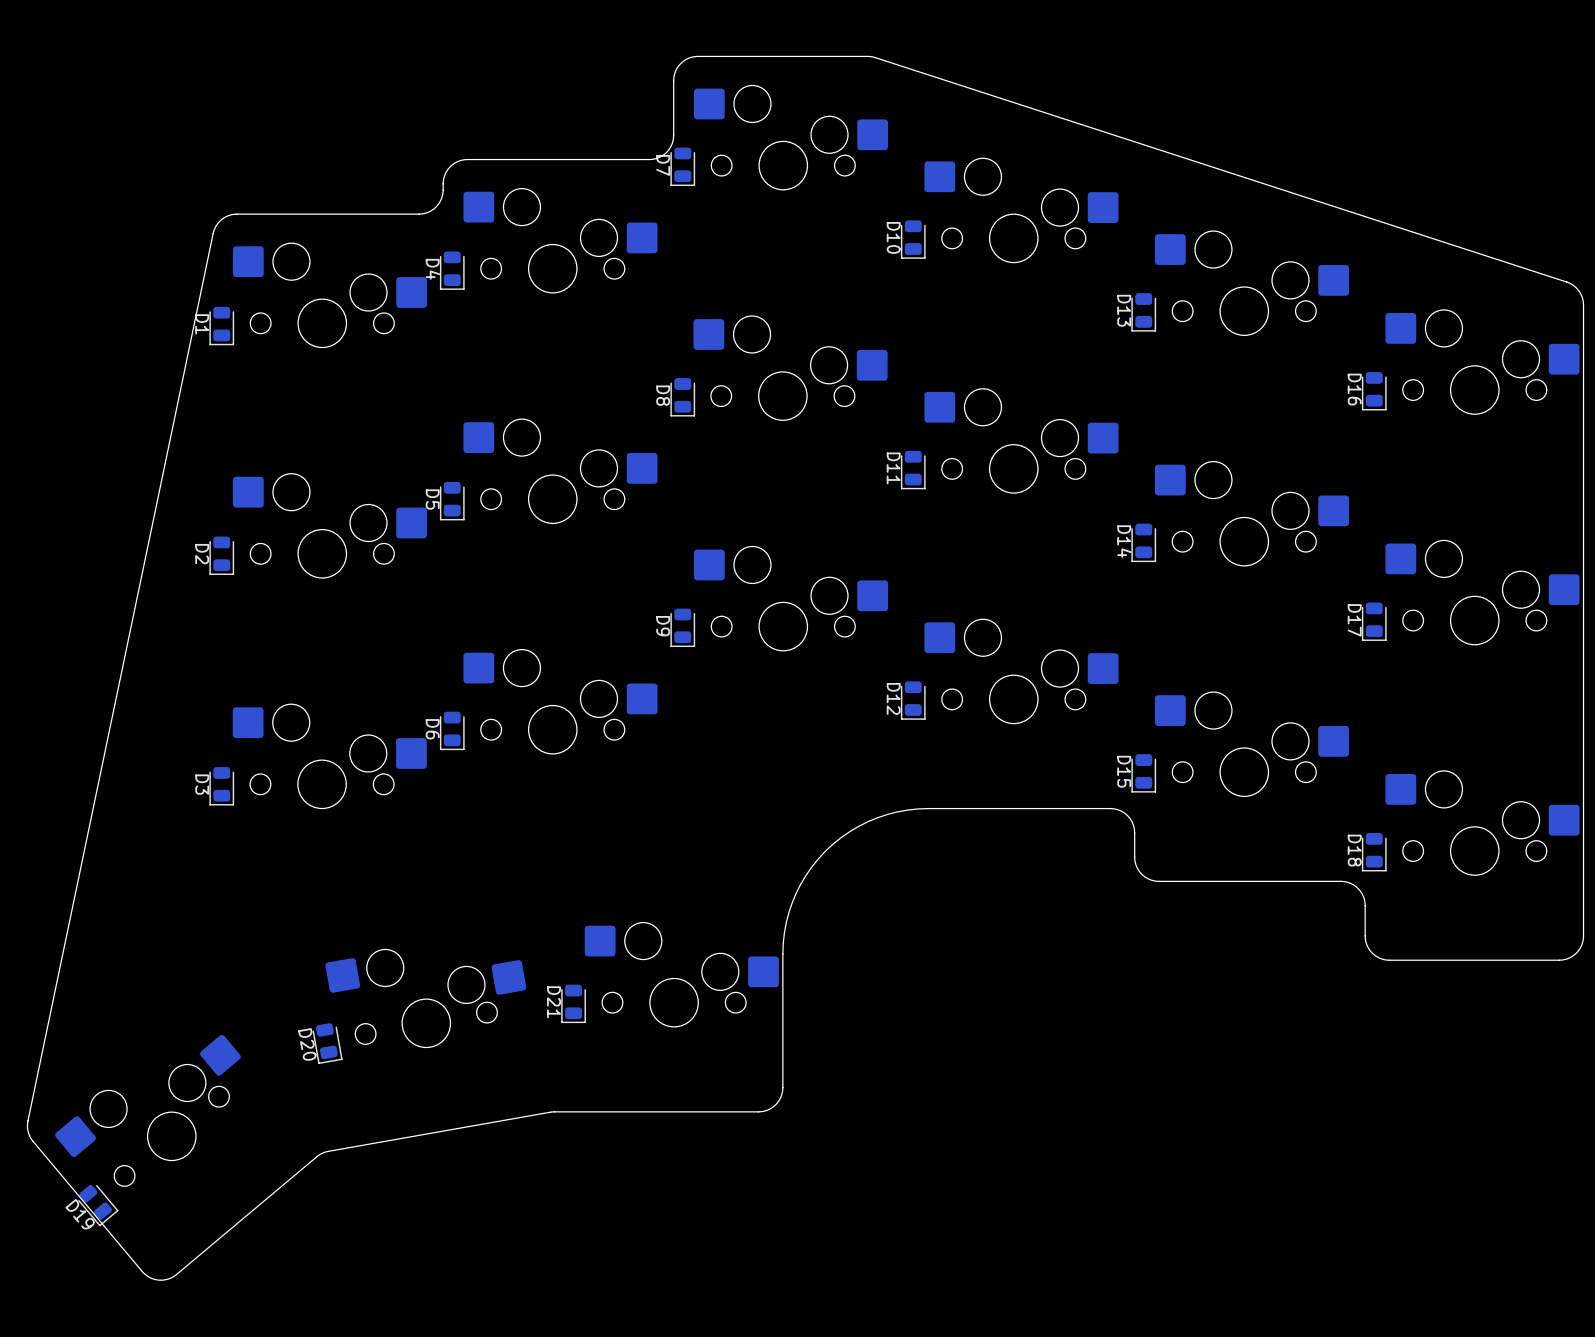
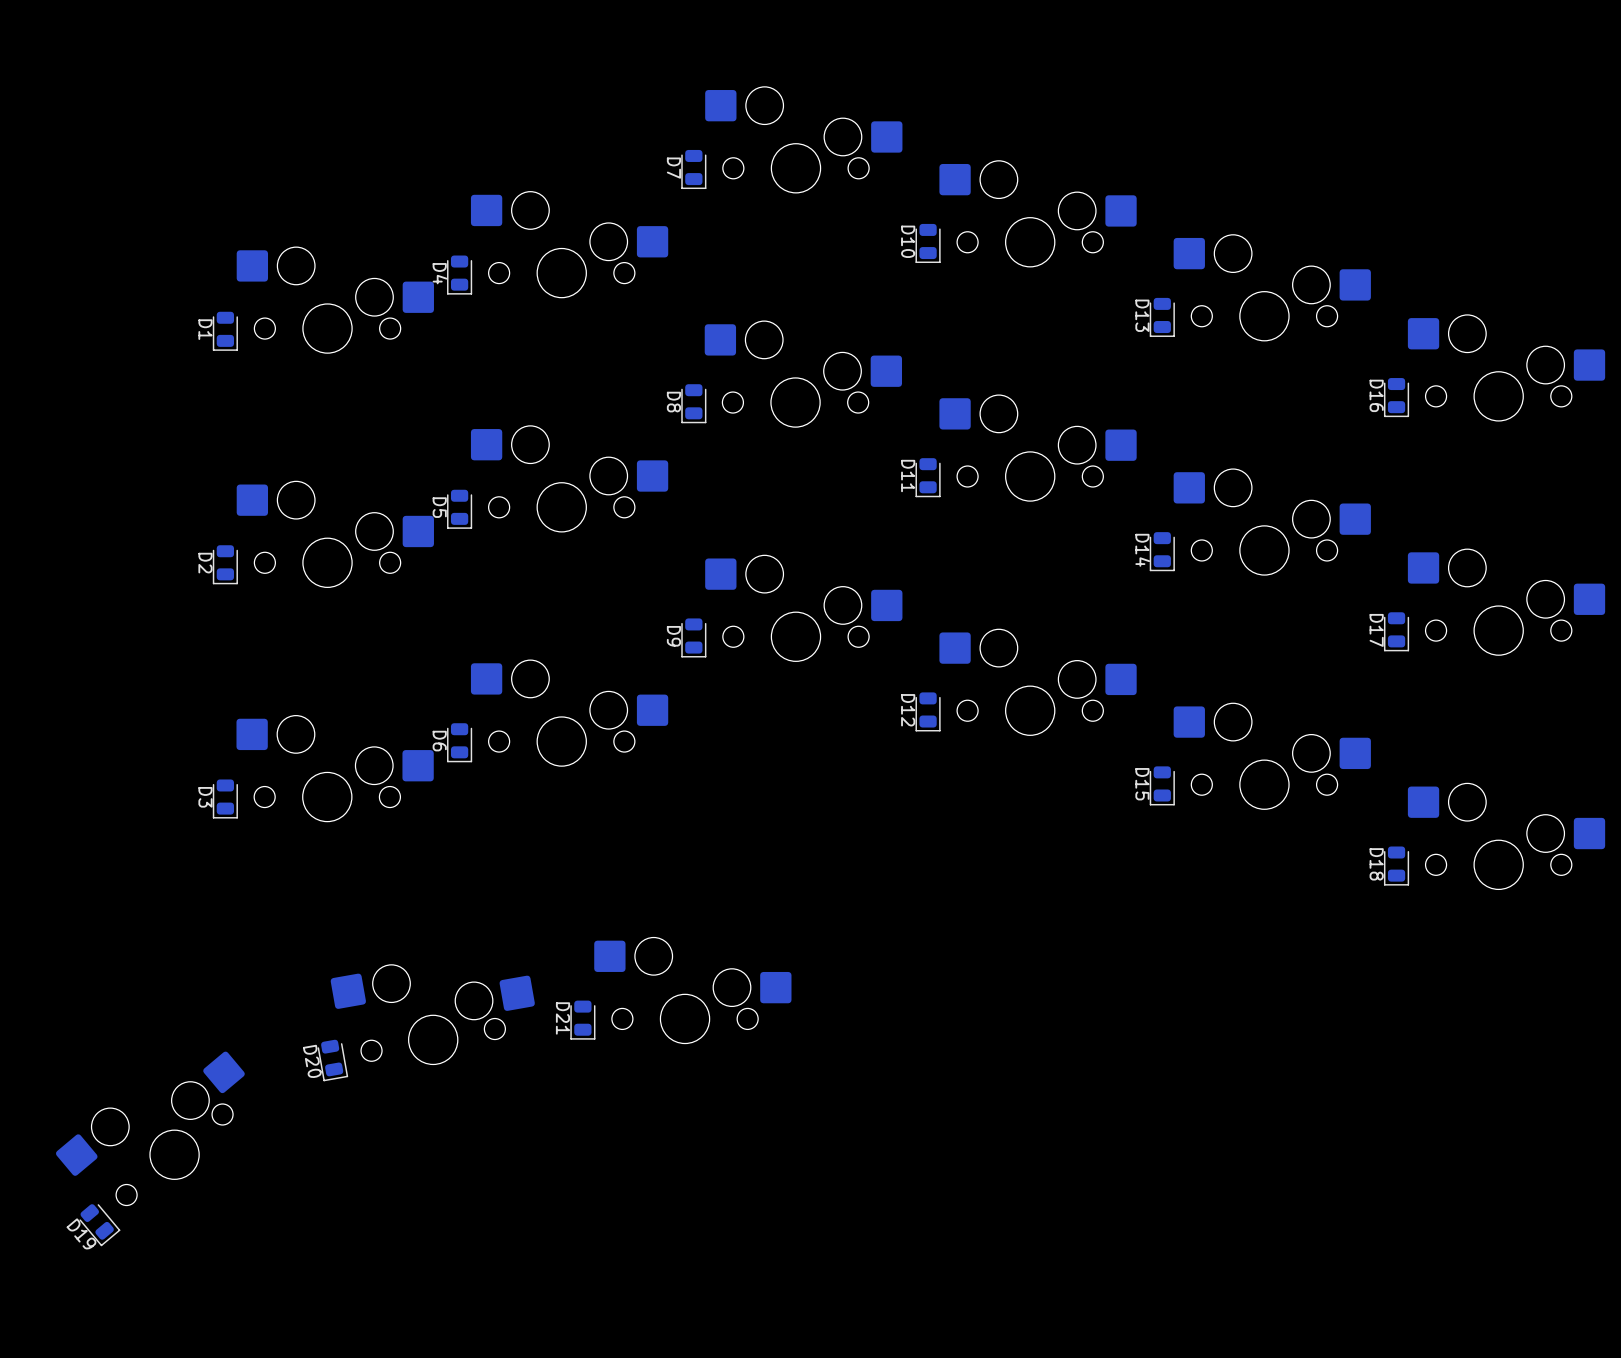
board edge: (867, 56) (697, 56) (687, 58) (678, 65) (674, 75) (672, 141) (666, 152) (655, 158) (464, 159) (456, 161) (448, 168) (443, 178) (442, 193) (439, 202) (433, 209) (425, 213) (234, 214) (223, 217) (216, 225) (27, 1123) (29, 1134) (33, 1141) (142, 1271) (149, 1277) (161, 1280) (173, 1276) (316, 1156) (326, 1151) (552, 1111) (758, 1111) (770, 1108) (777, 1102) (782, 1090) (783, 943) (788, 913) (796, 893) (811, 866) (833, 844) (858, 826) (897, 811) (928, 808) (1118, 809) (1127, 815) (1133, 824) (1134, 859) (1137, 867) (1143, 876) (1150, 880) (1340, 881) (1353, 885) (1359, 890) (1364, 900) (1366, 943) (1374, 954) (1384, 959) (1559, 960) (1571, 956) (1580, 948) (1583, 935) (1583, 305) (1578, 290) (1566, 282) (867, 56) -> none

